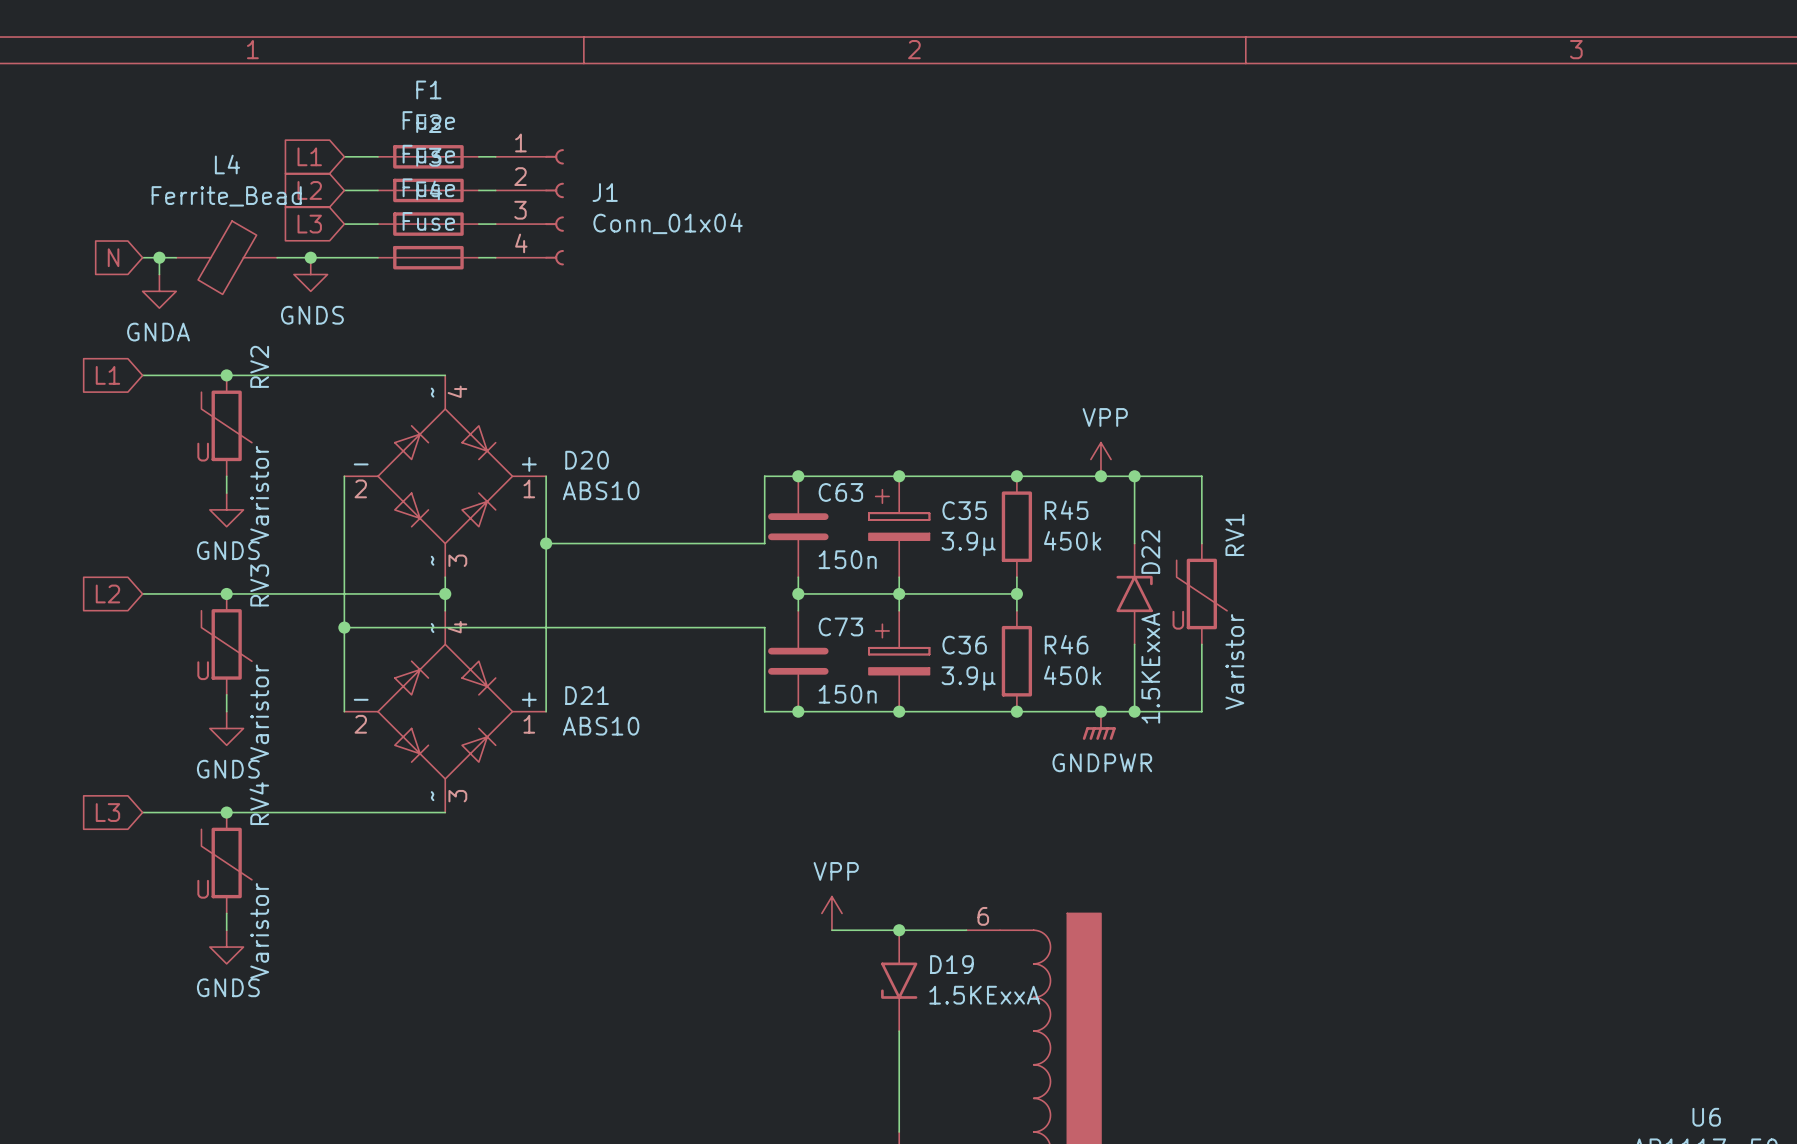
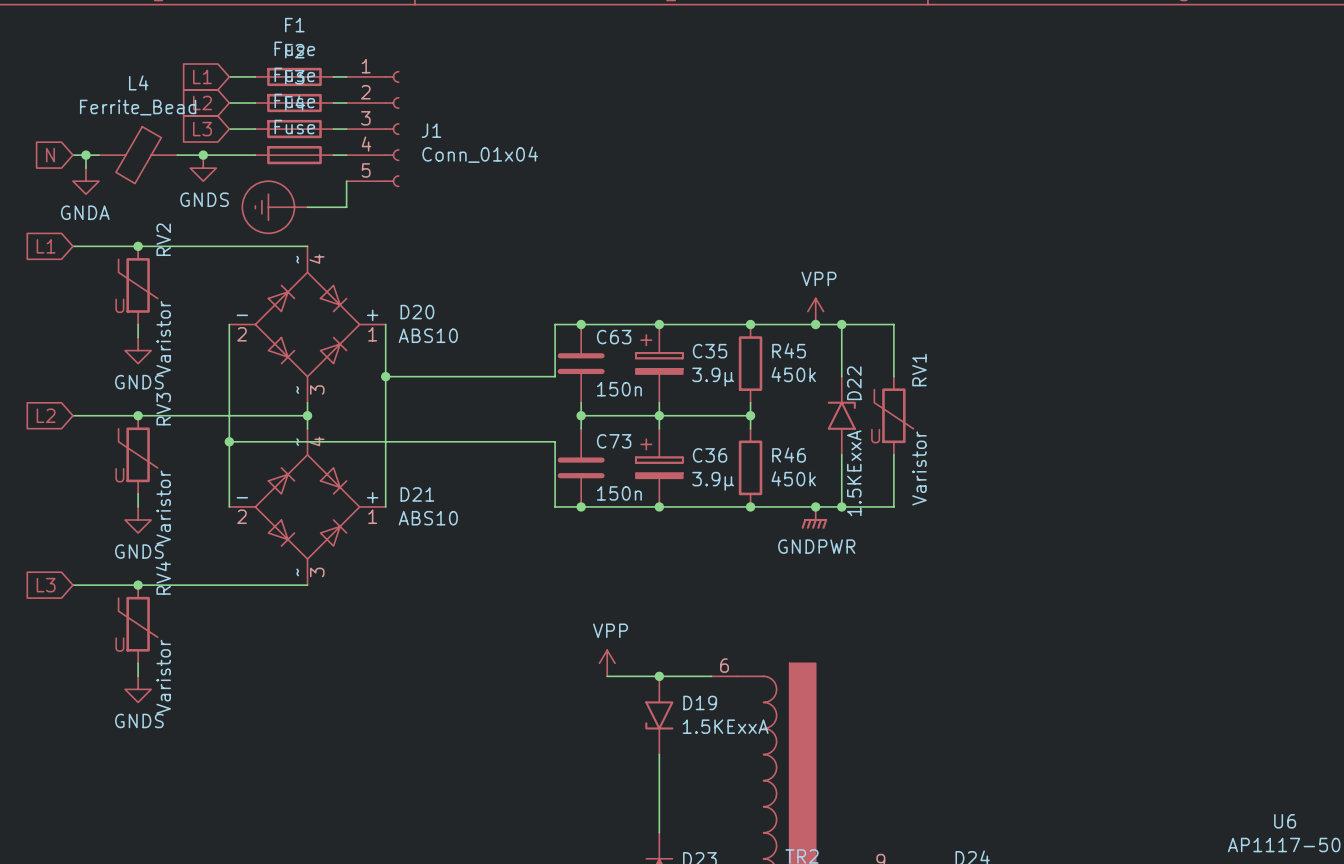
J1 symbol: [495, 149, 564, 266] -> [346, 70, 400, 188]
wire: none -> (346, 181) (346, 207) (307, 207)
power symbol: none -> (274, 207)

